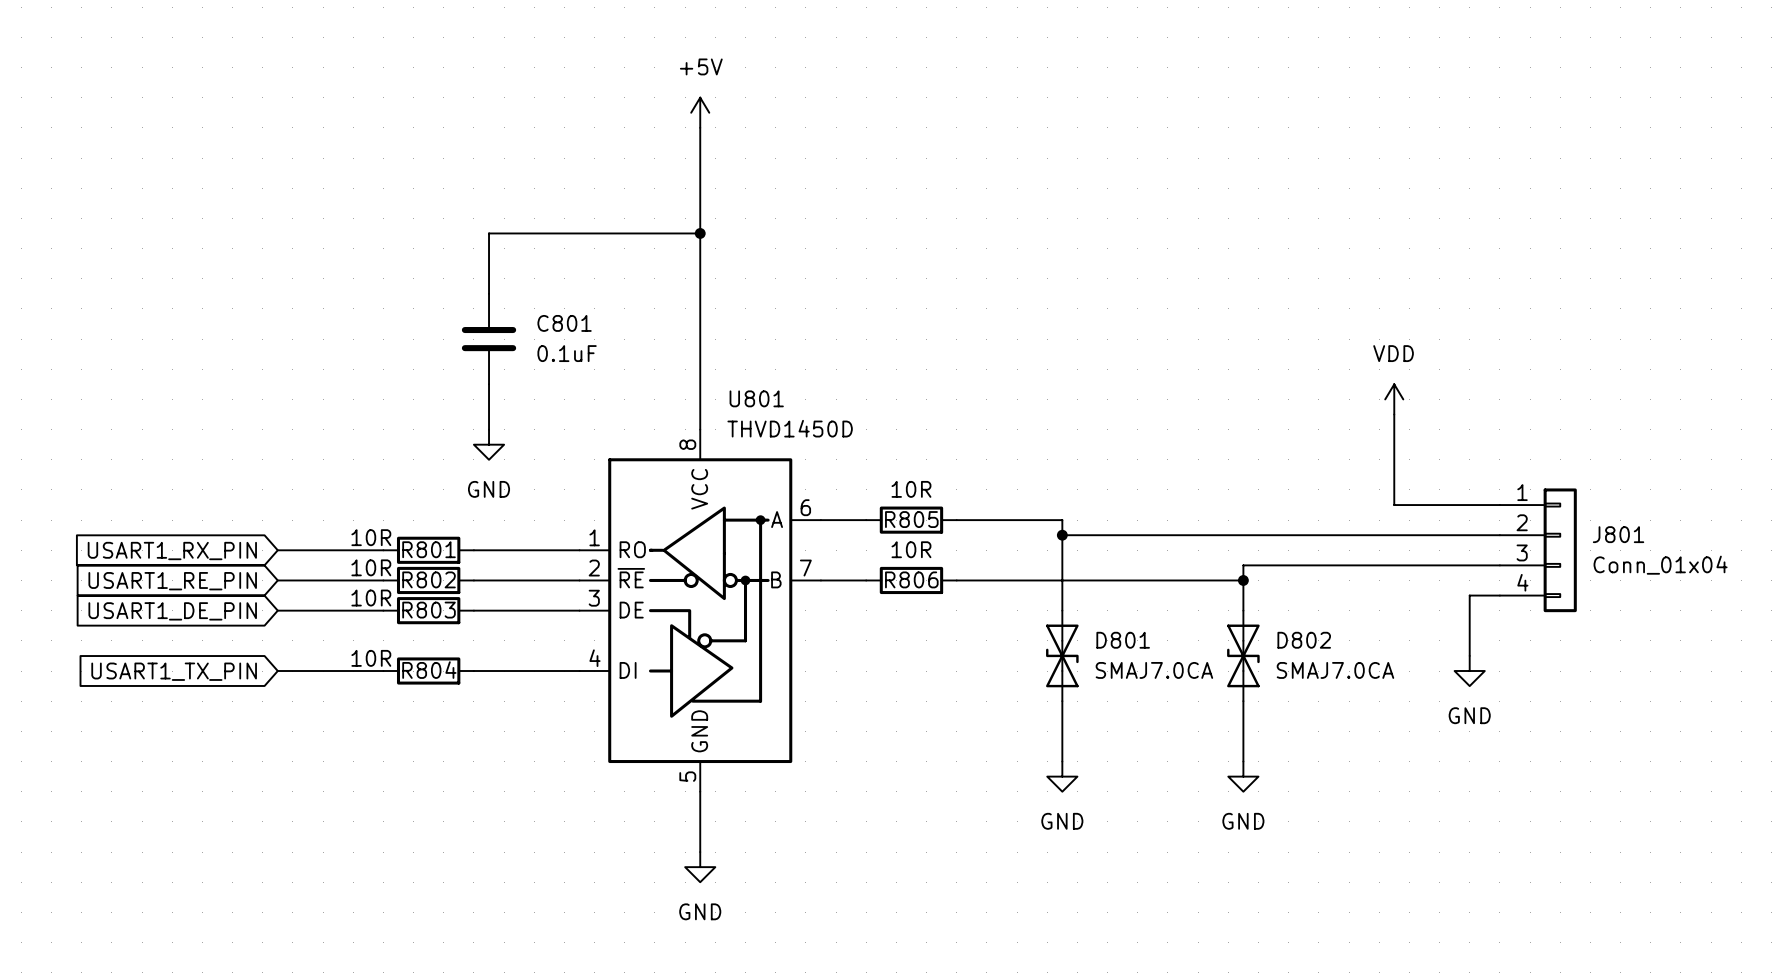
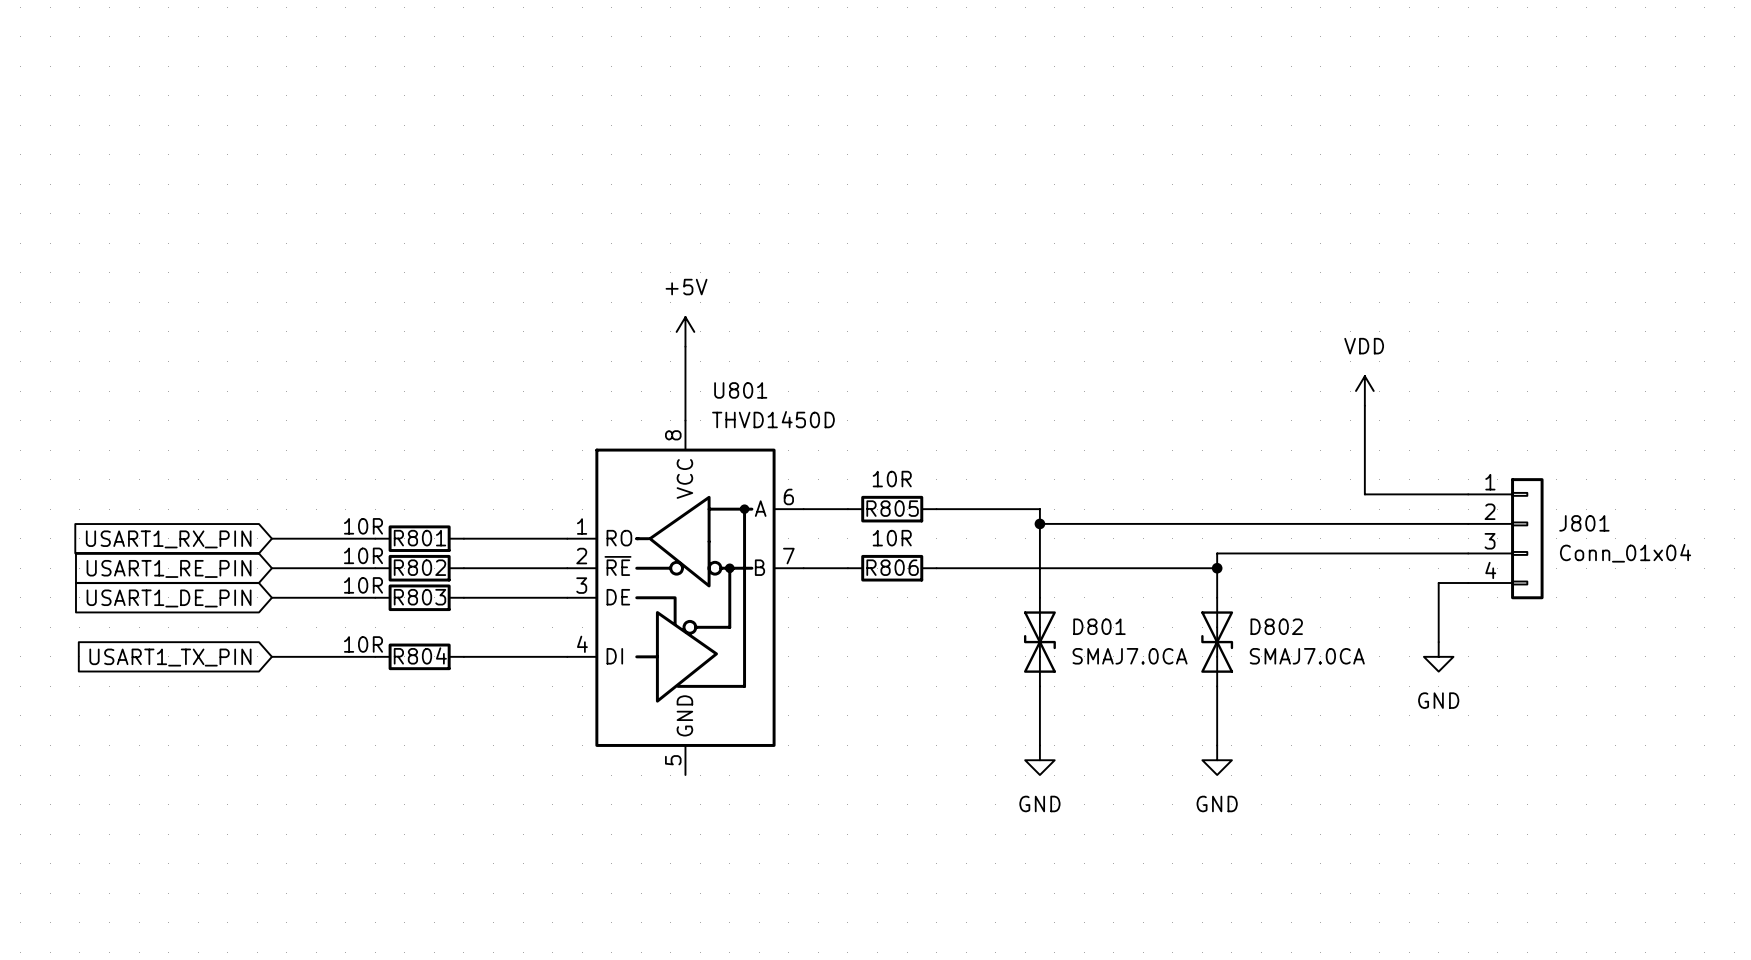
power symbol position: +5V (700, 112) -> +5V (685, 331)
wire: (700, 127) (700, 354) -> none
wire: (700, 233) (489, 233) (489, 293) -> none
junction: (700, 233) -> none
C801: 0.1uF (489, 339) -> none
wire: (489, 384) (489, 429) -> none
power symbol: GND (489, 444) -> none
wire: (700, 791) (700, 852) -> none
power symbol: GND (700, 867) -> none

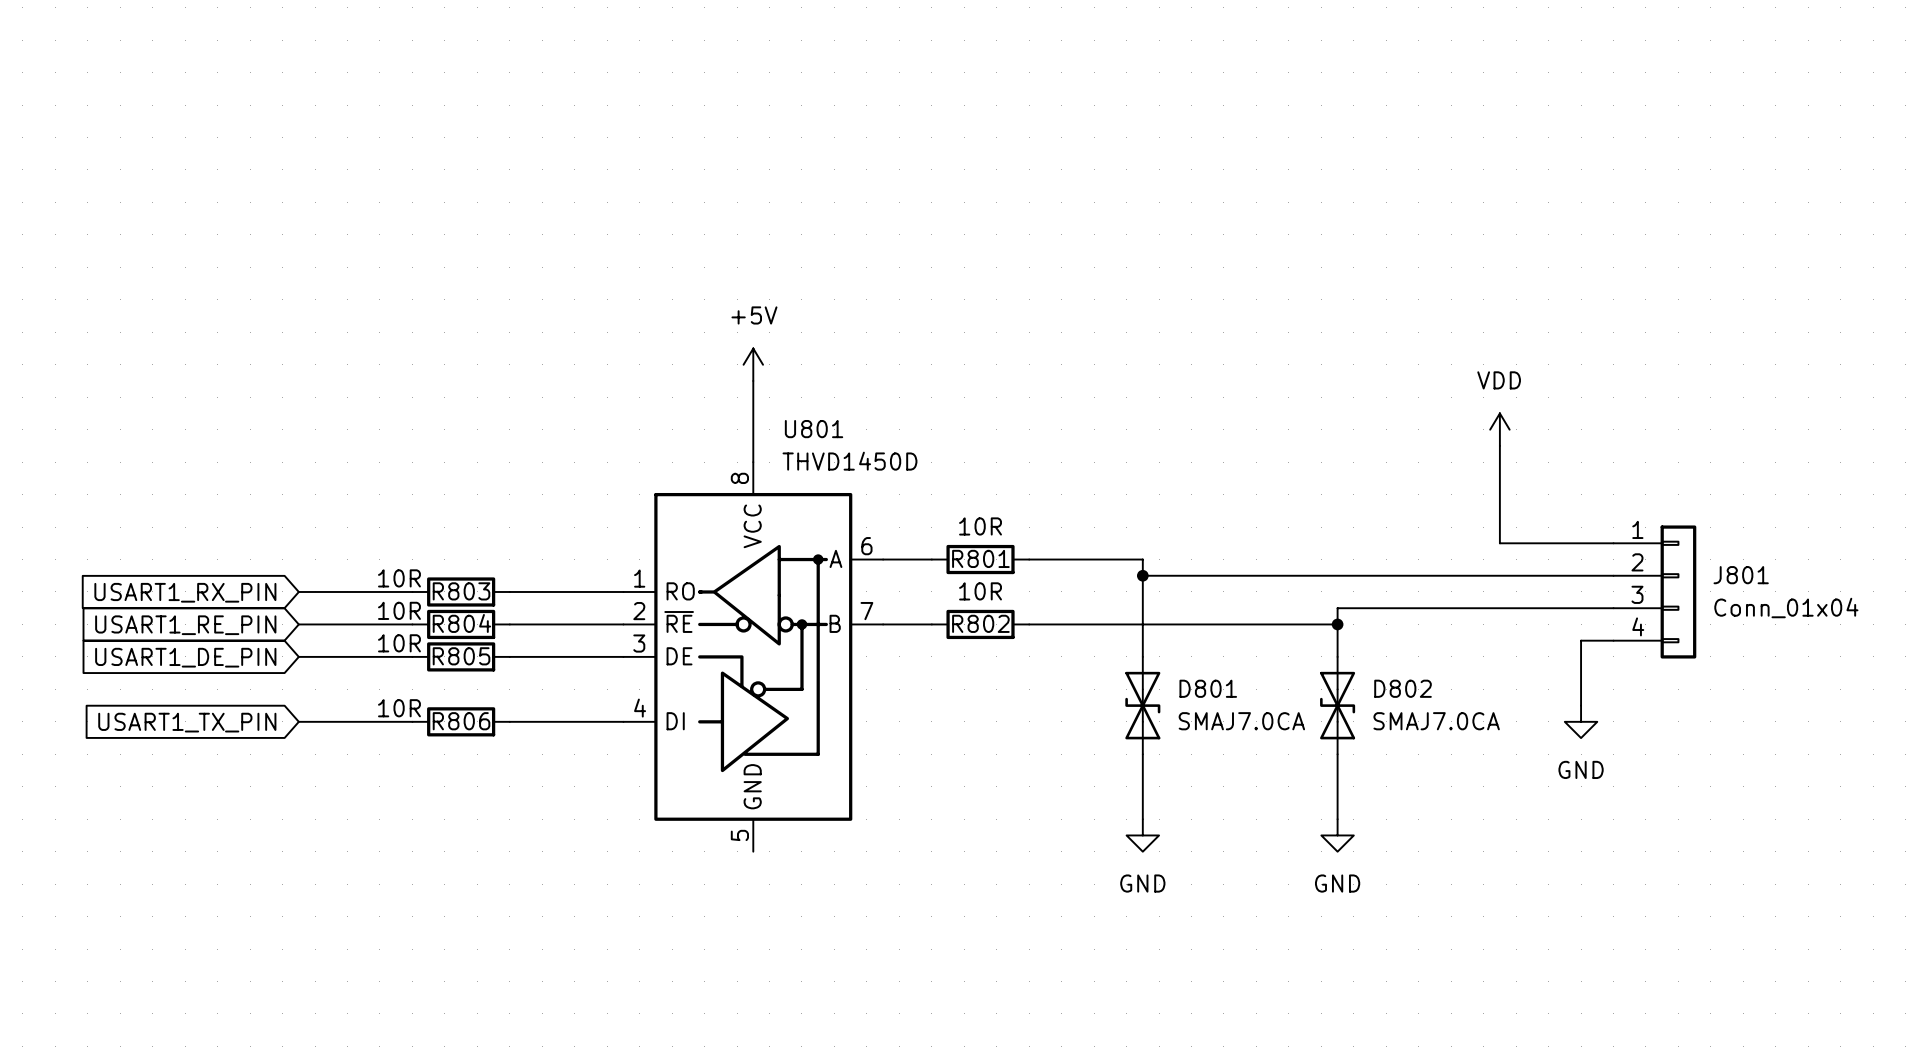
R805 name: R805 (892, 508) -> R801 (980, 558)
R801 name: R801 (419, 538) -> R803 (461, 591)
R802 name: R802 (419, 567) -> R804 (461, 623)
R806 name: R806 (892, 567) -> R802 (980, 623)
R803 name: R803 (419, 597) -> R805 (461, 656)
R804 name: R804 (420, 655) -> R806 (461, 721)

